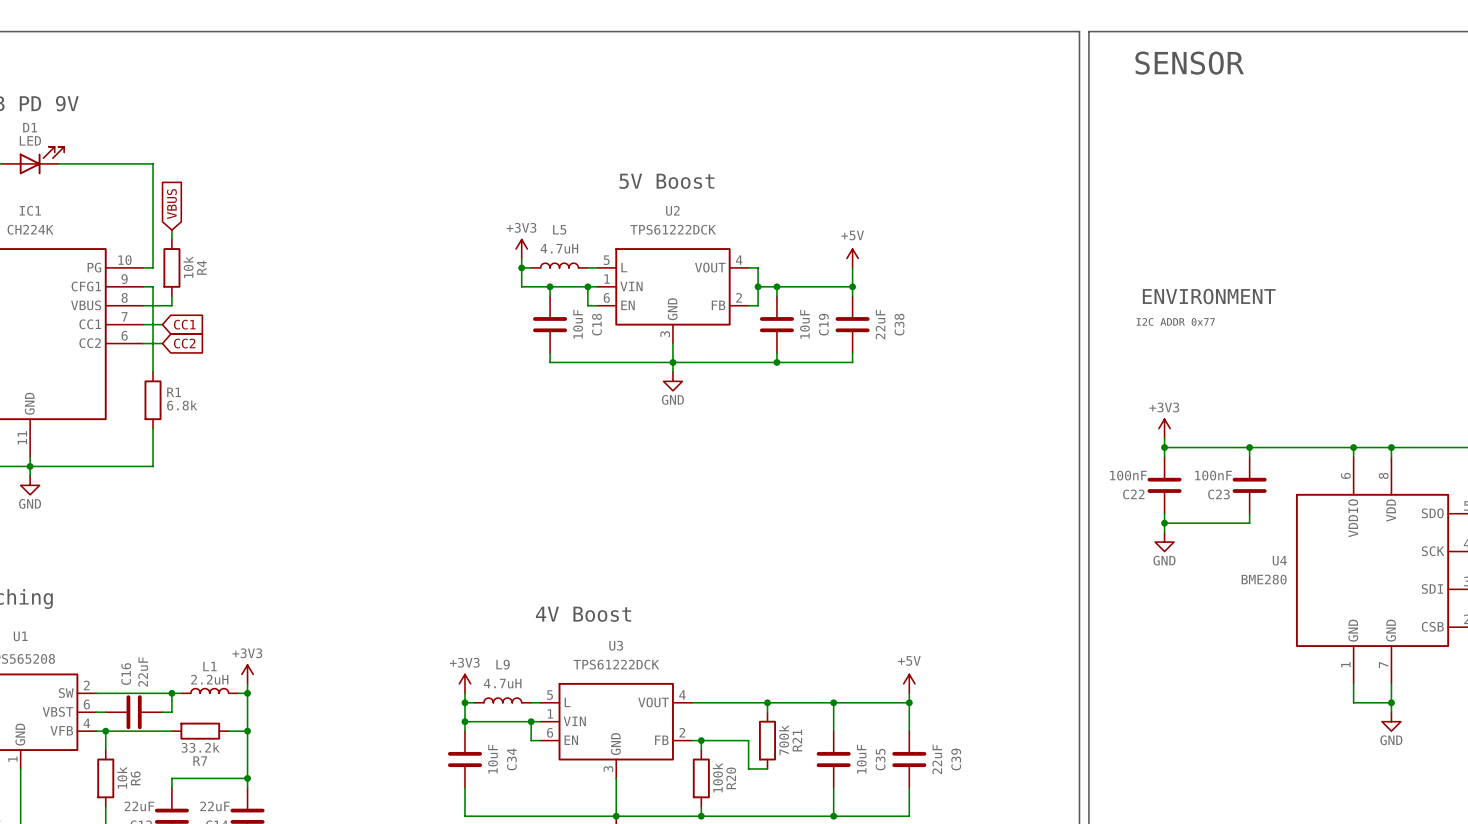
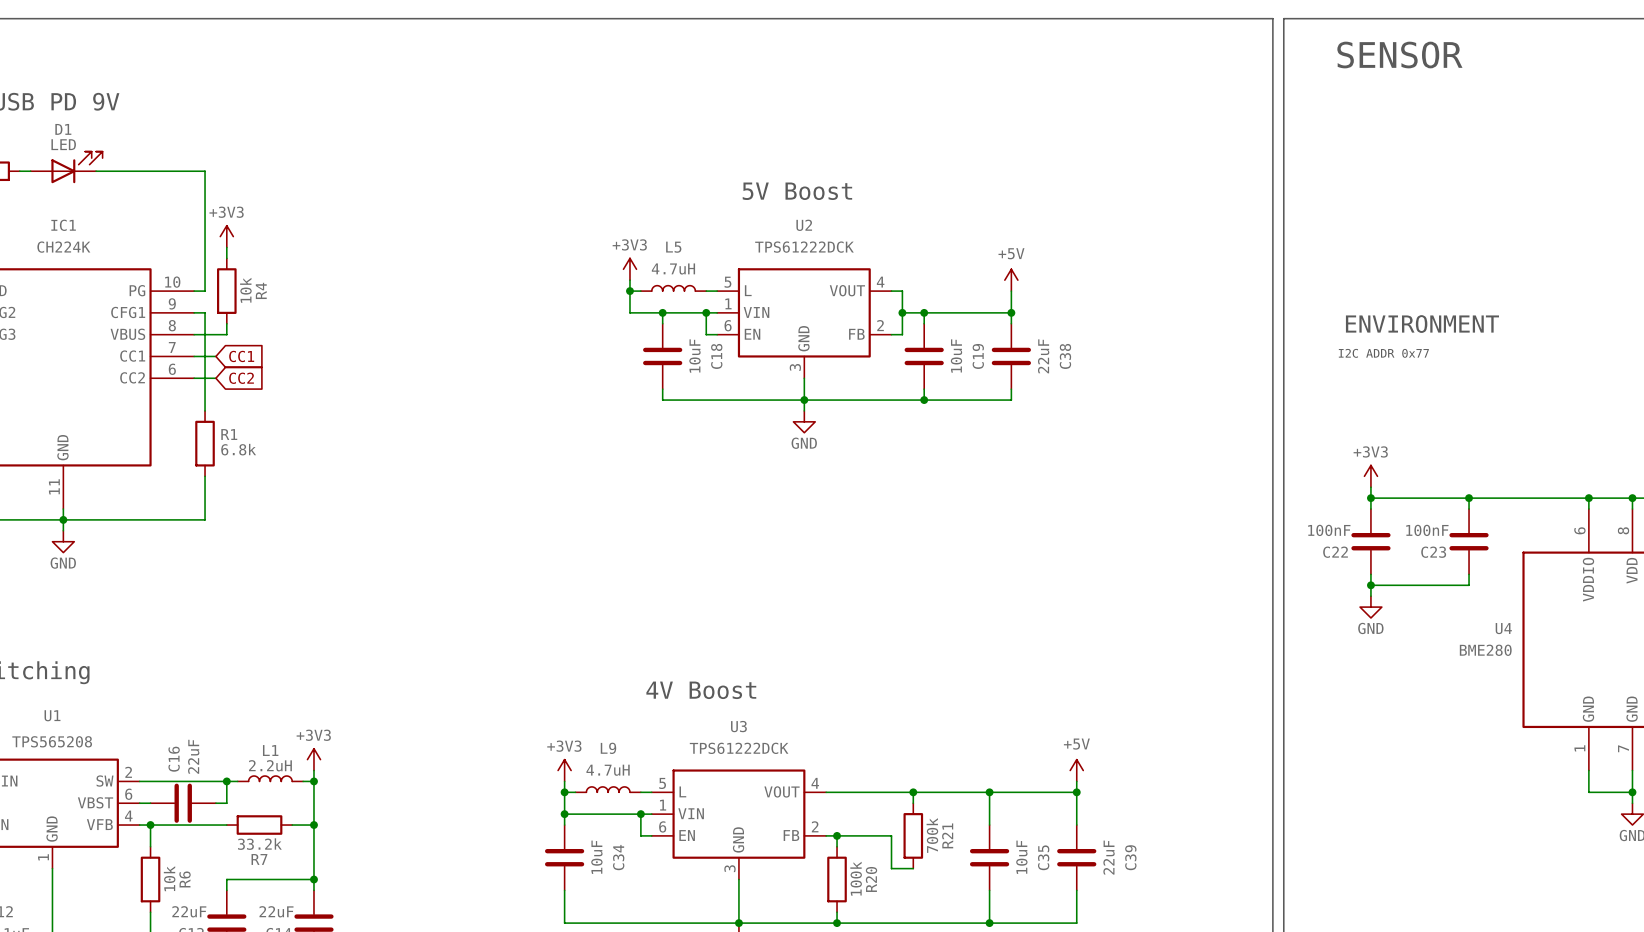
global label: VBUS (171, 204) -> none
power symbol: none -> +3V3 (226, 236)

